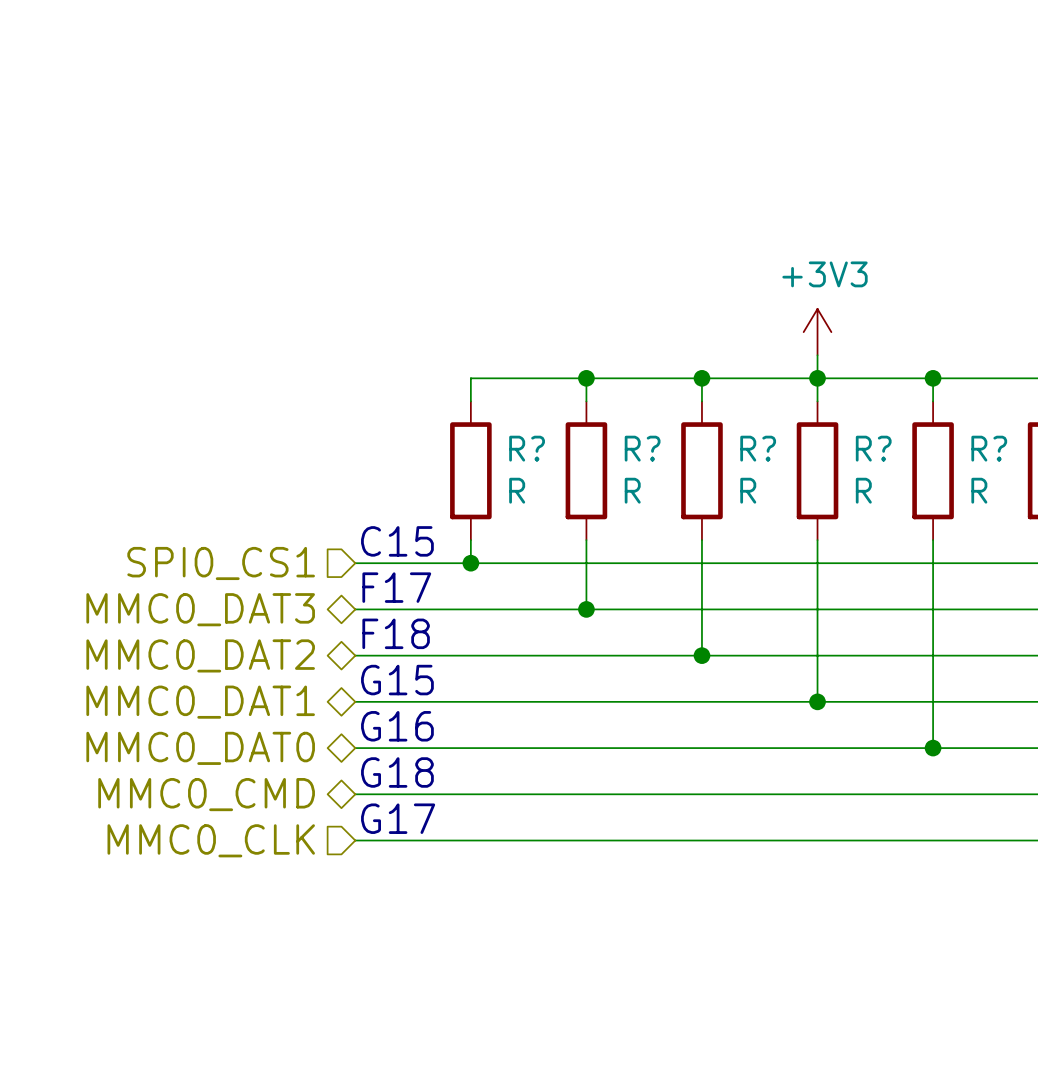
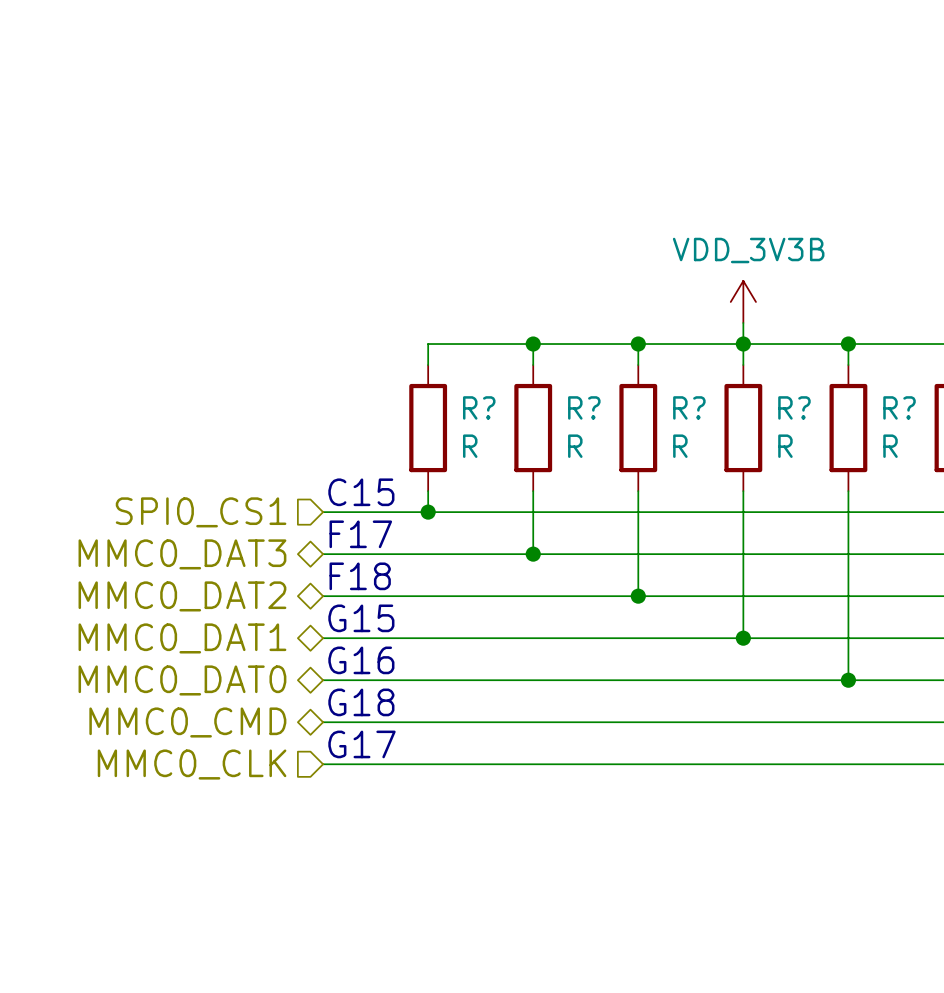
power symbol: +3V3 (817, 332) -> VDD_3V3B (743, 301)

